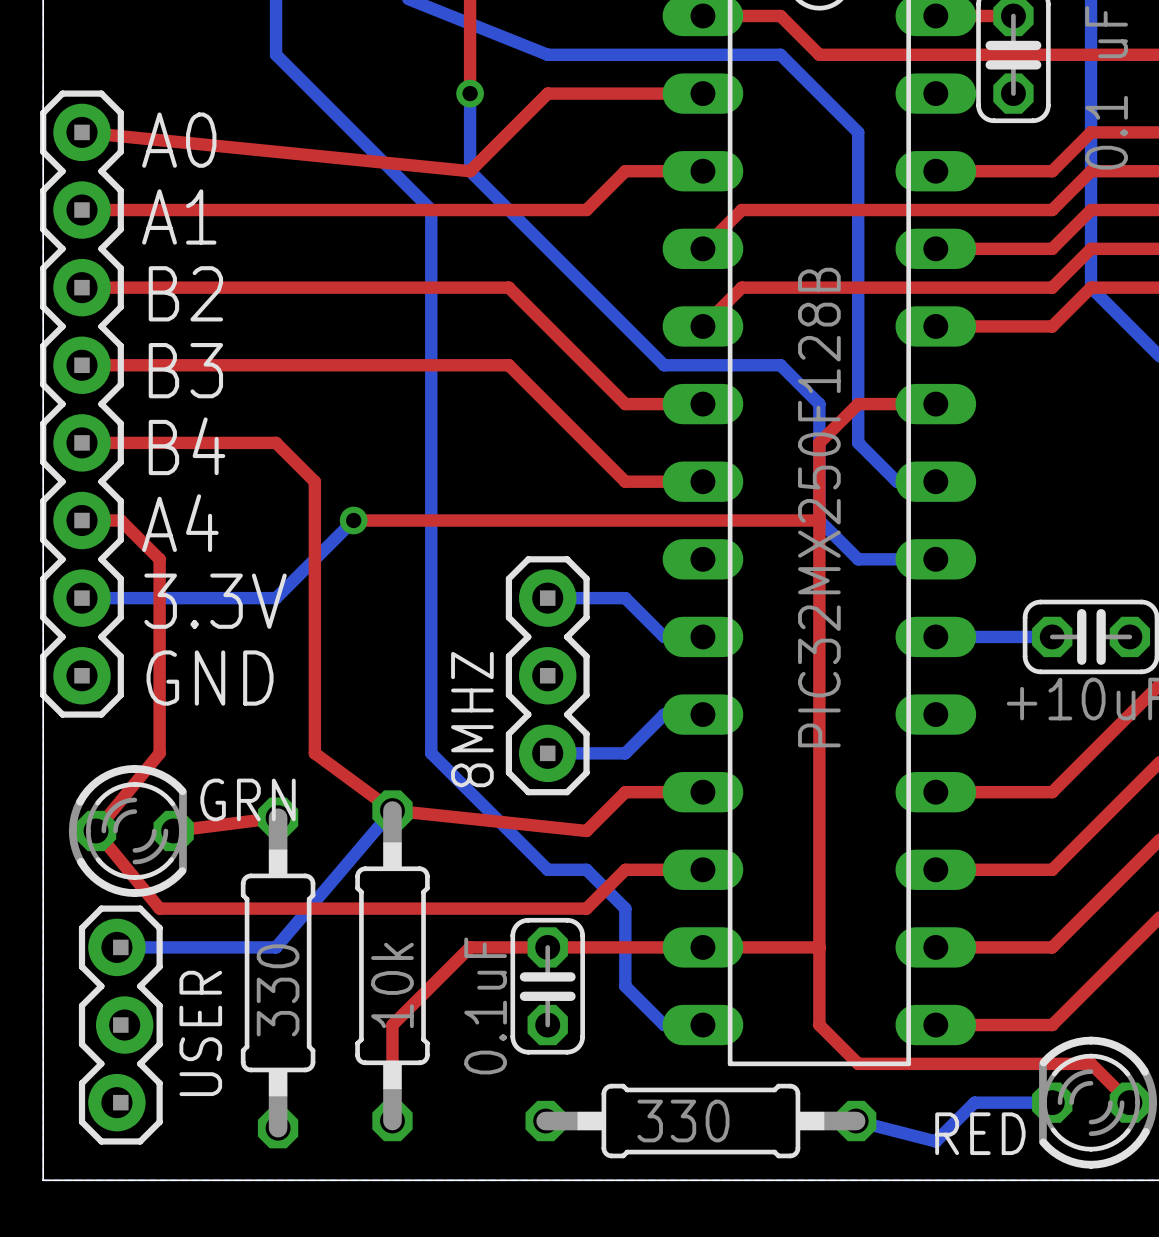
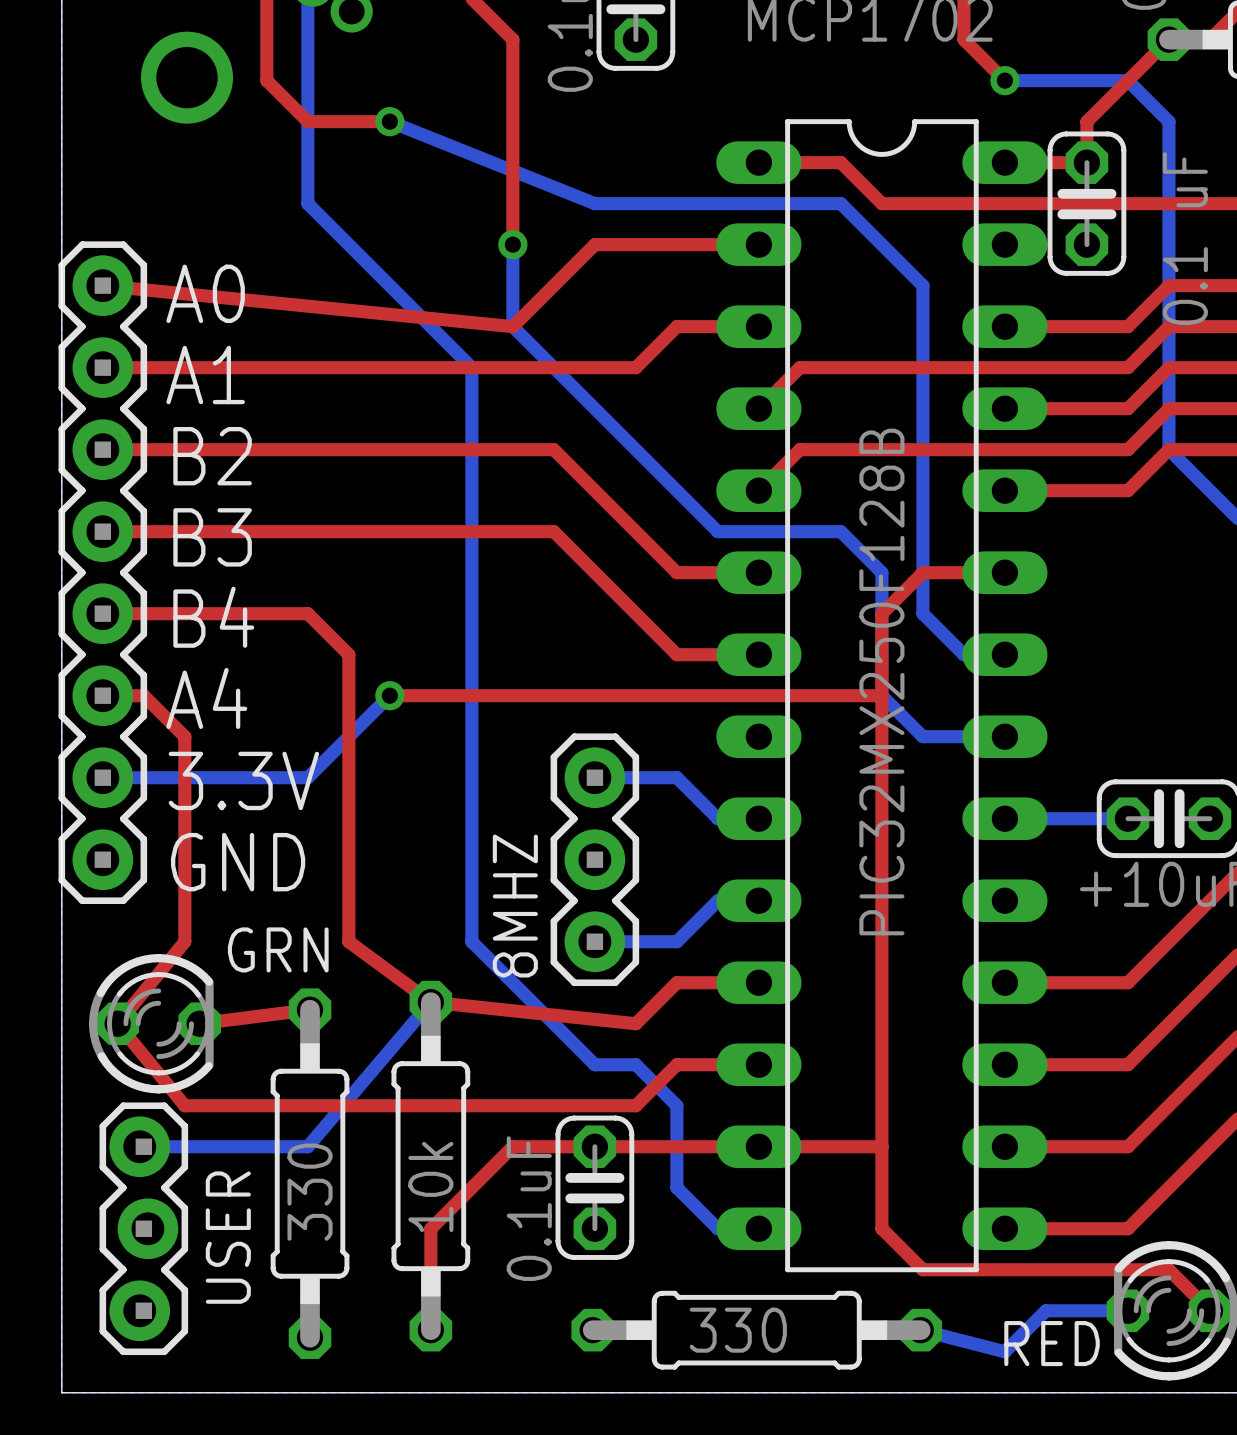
GRN name position: GRN (248, 799) -> GRN (278, 949)

